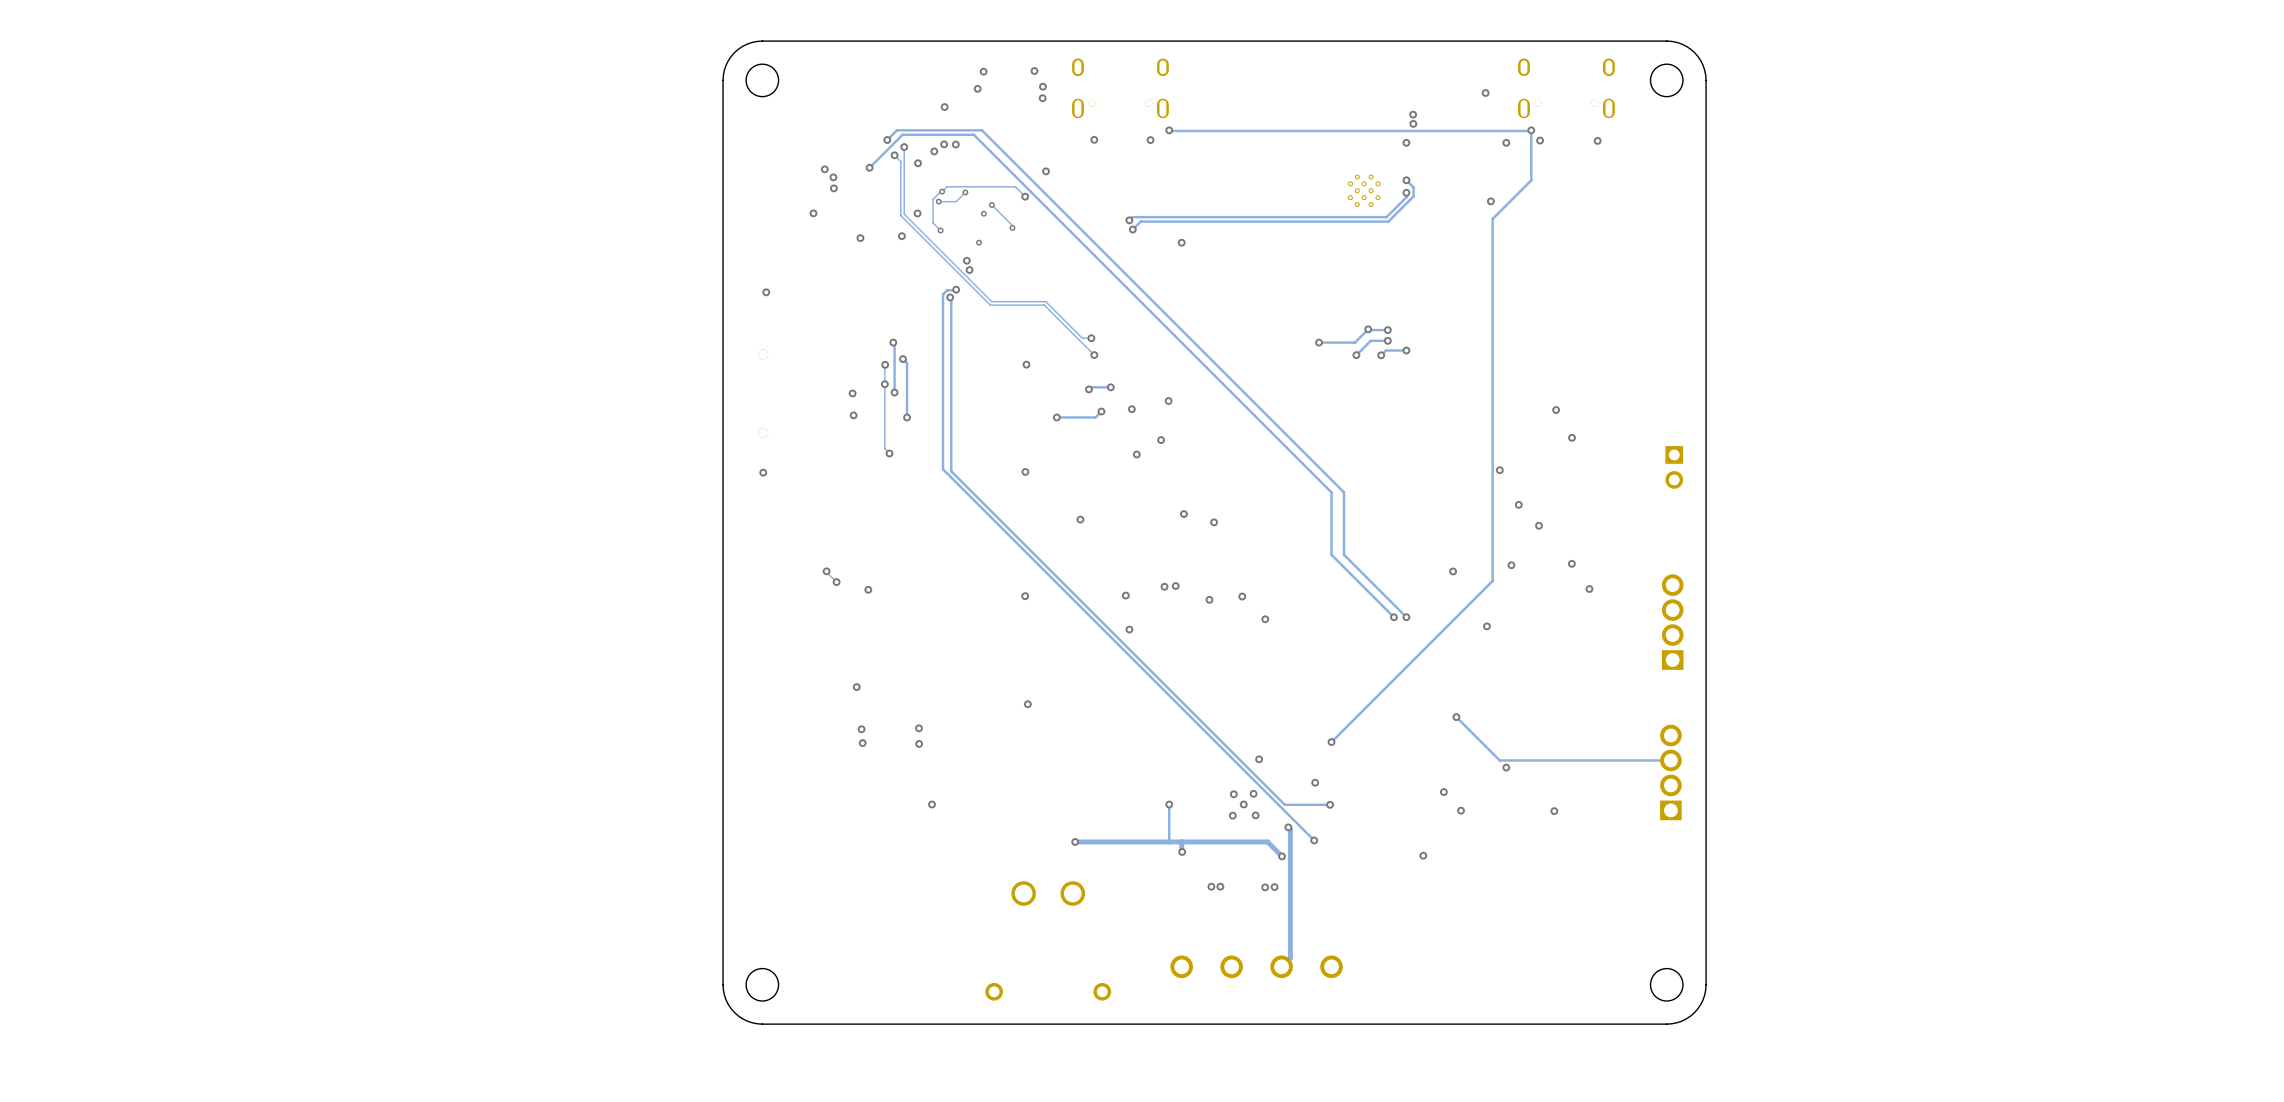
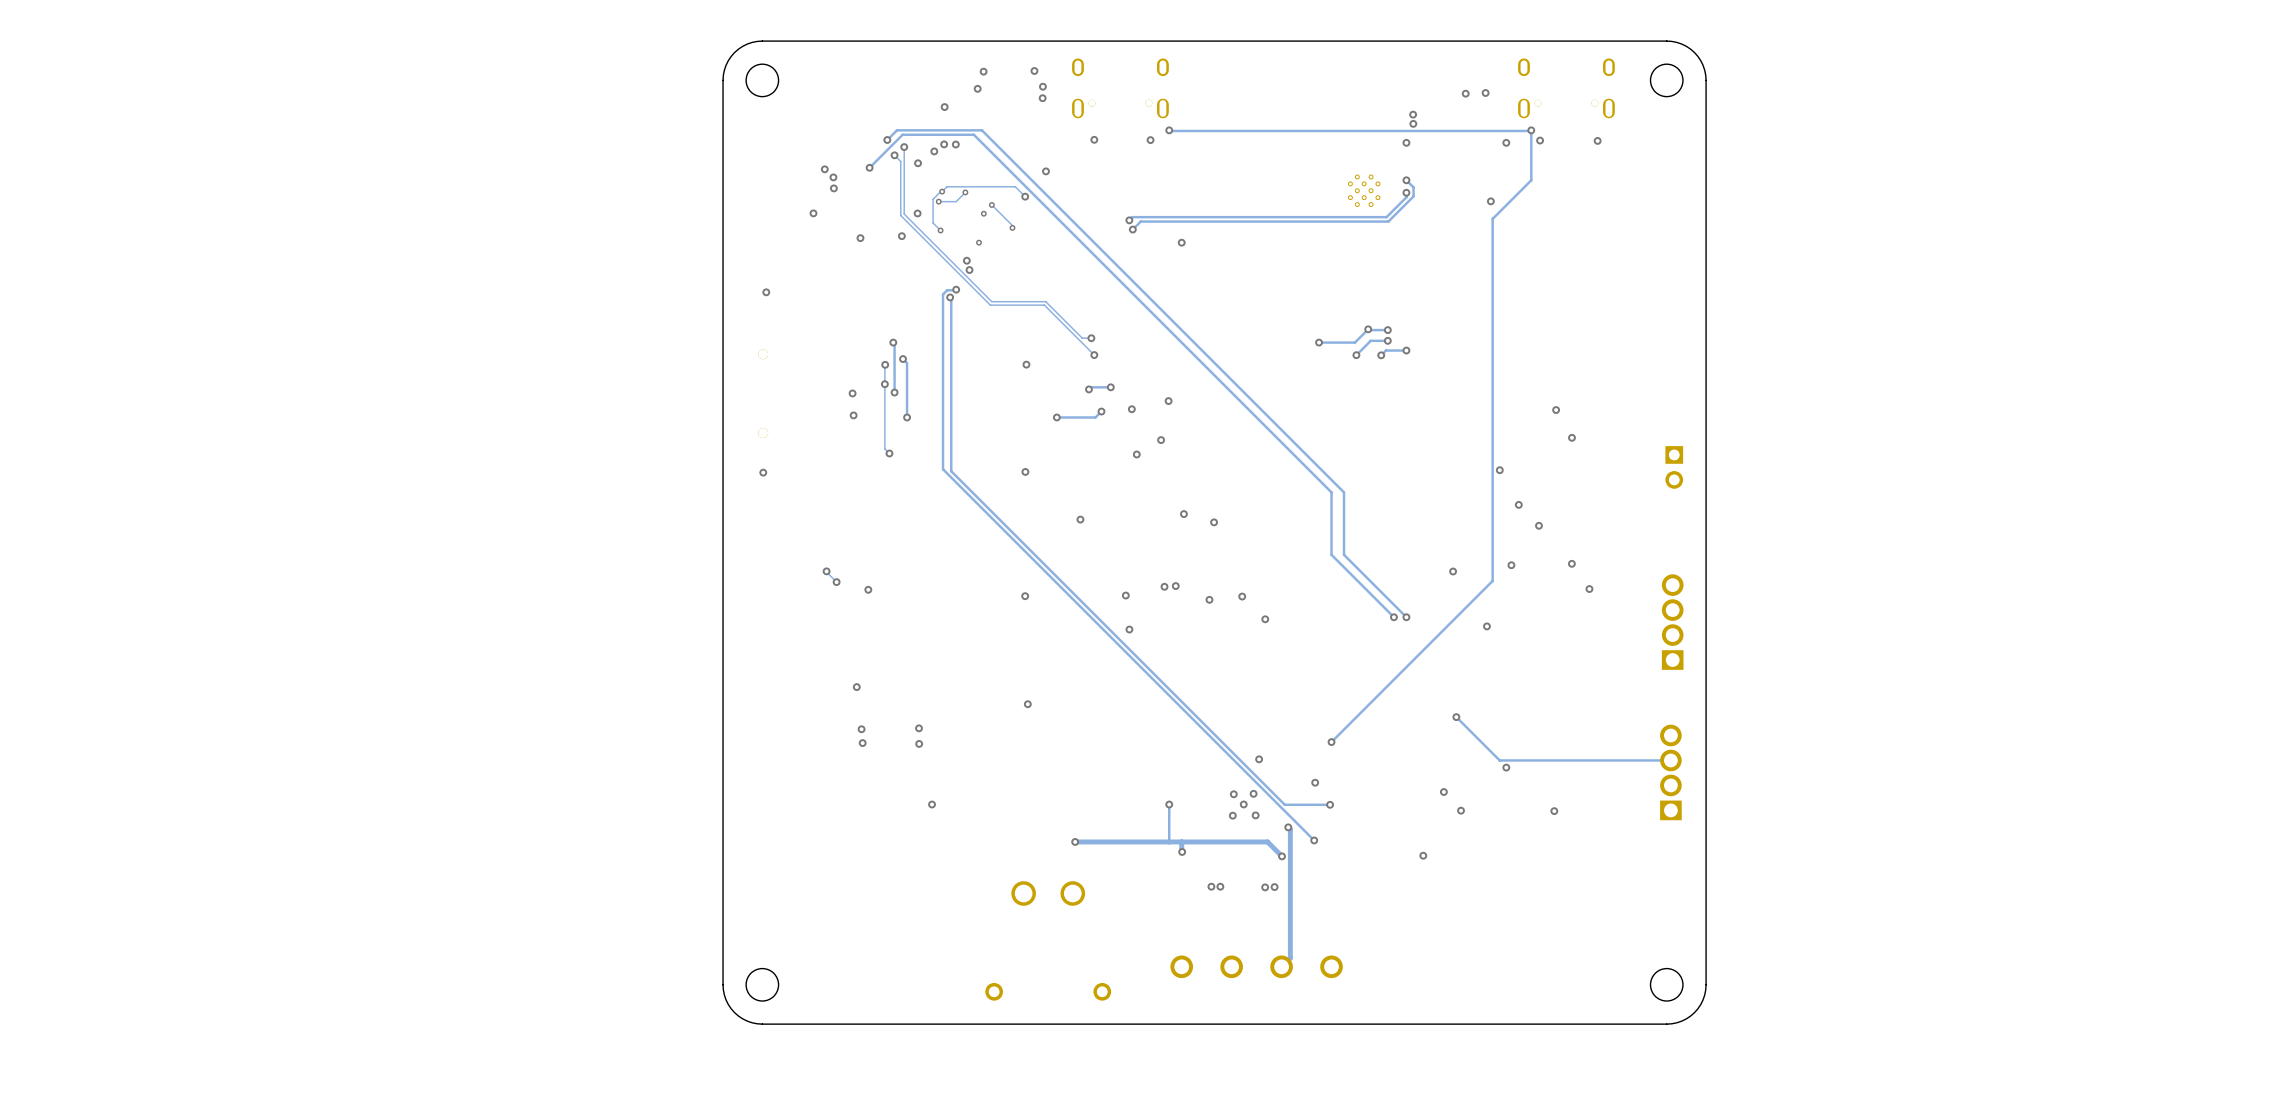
via: none -> (1465, 93)

